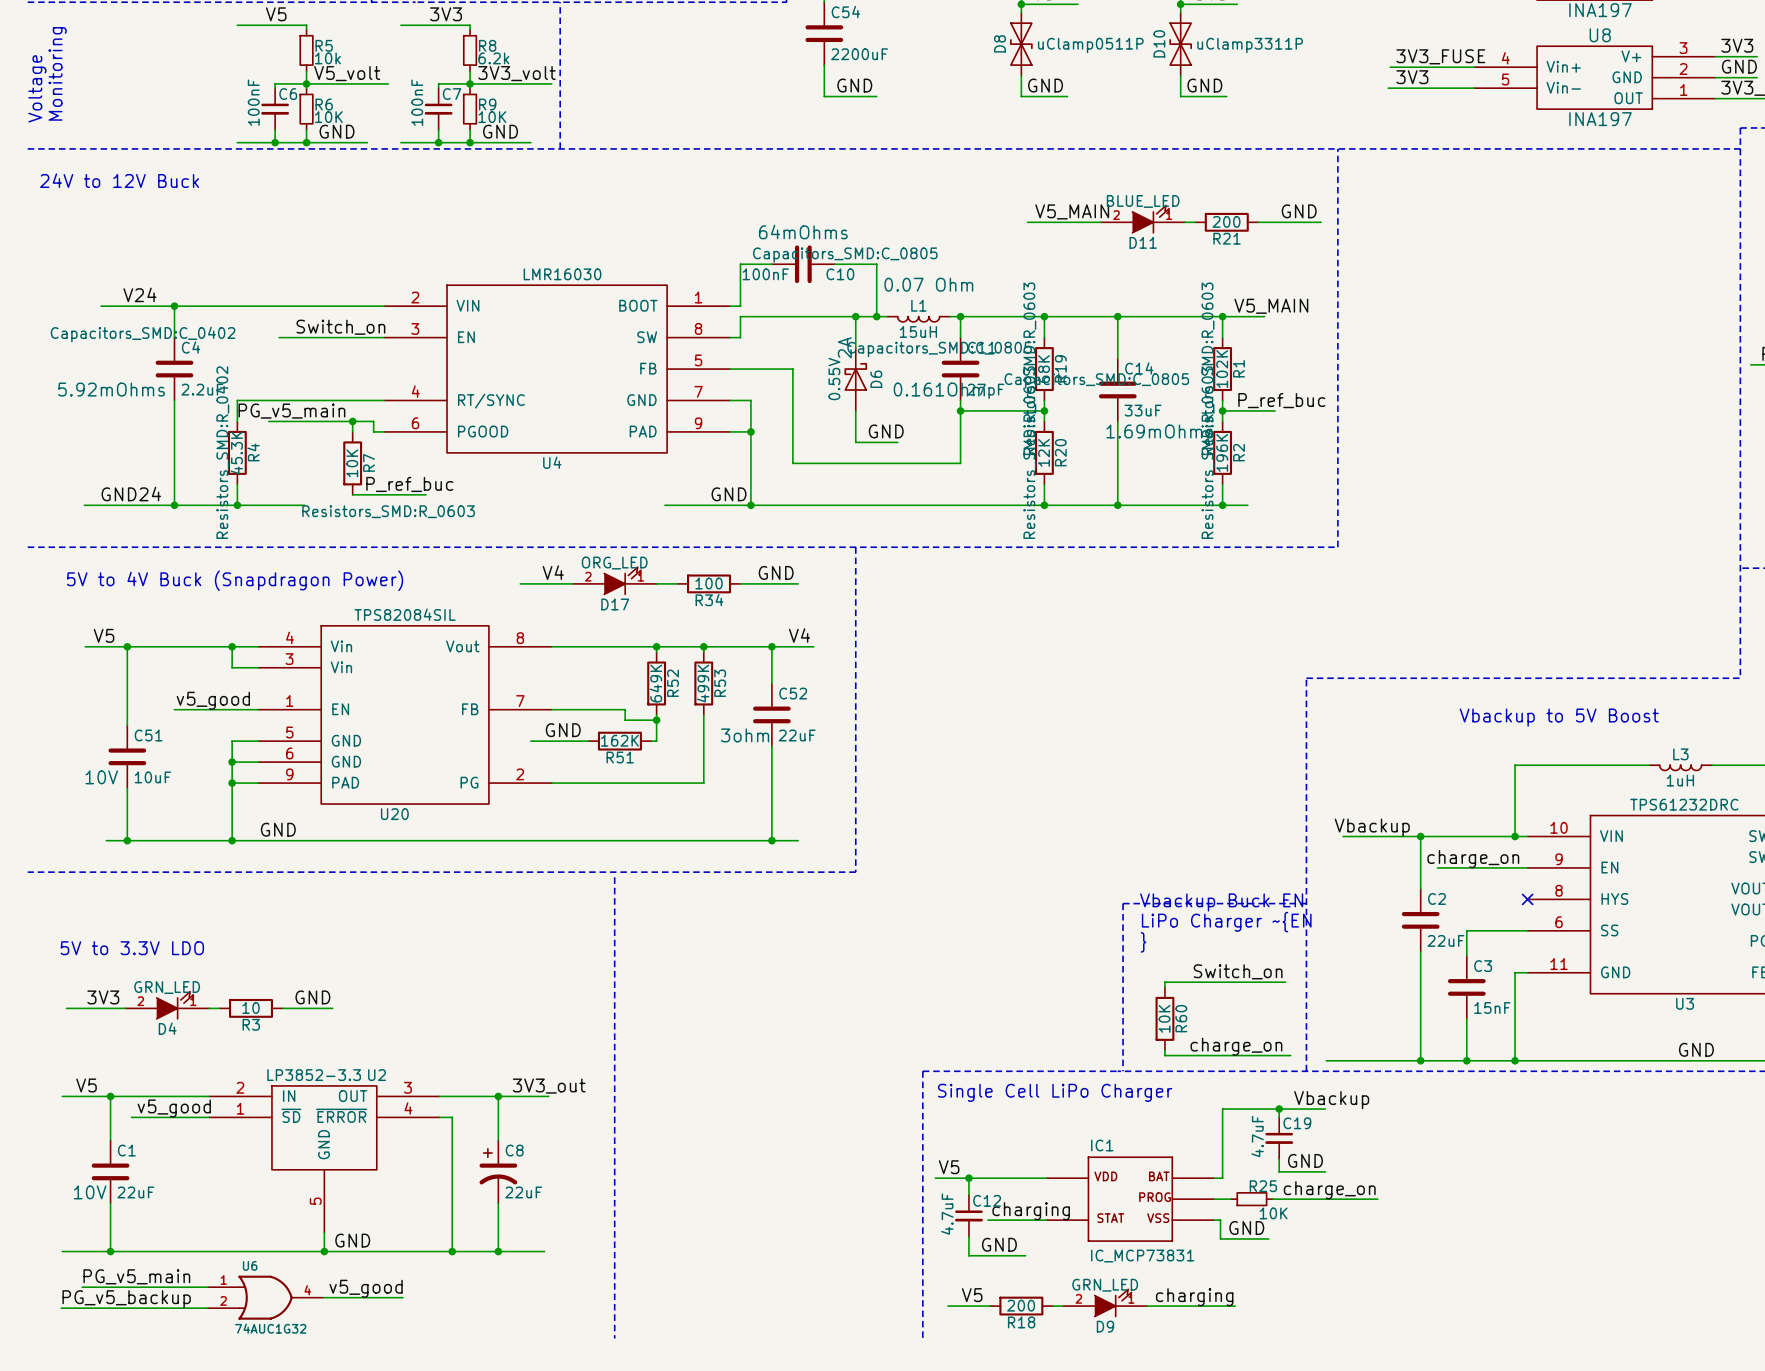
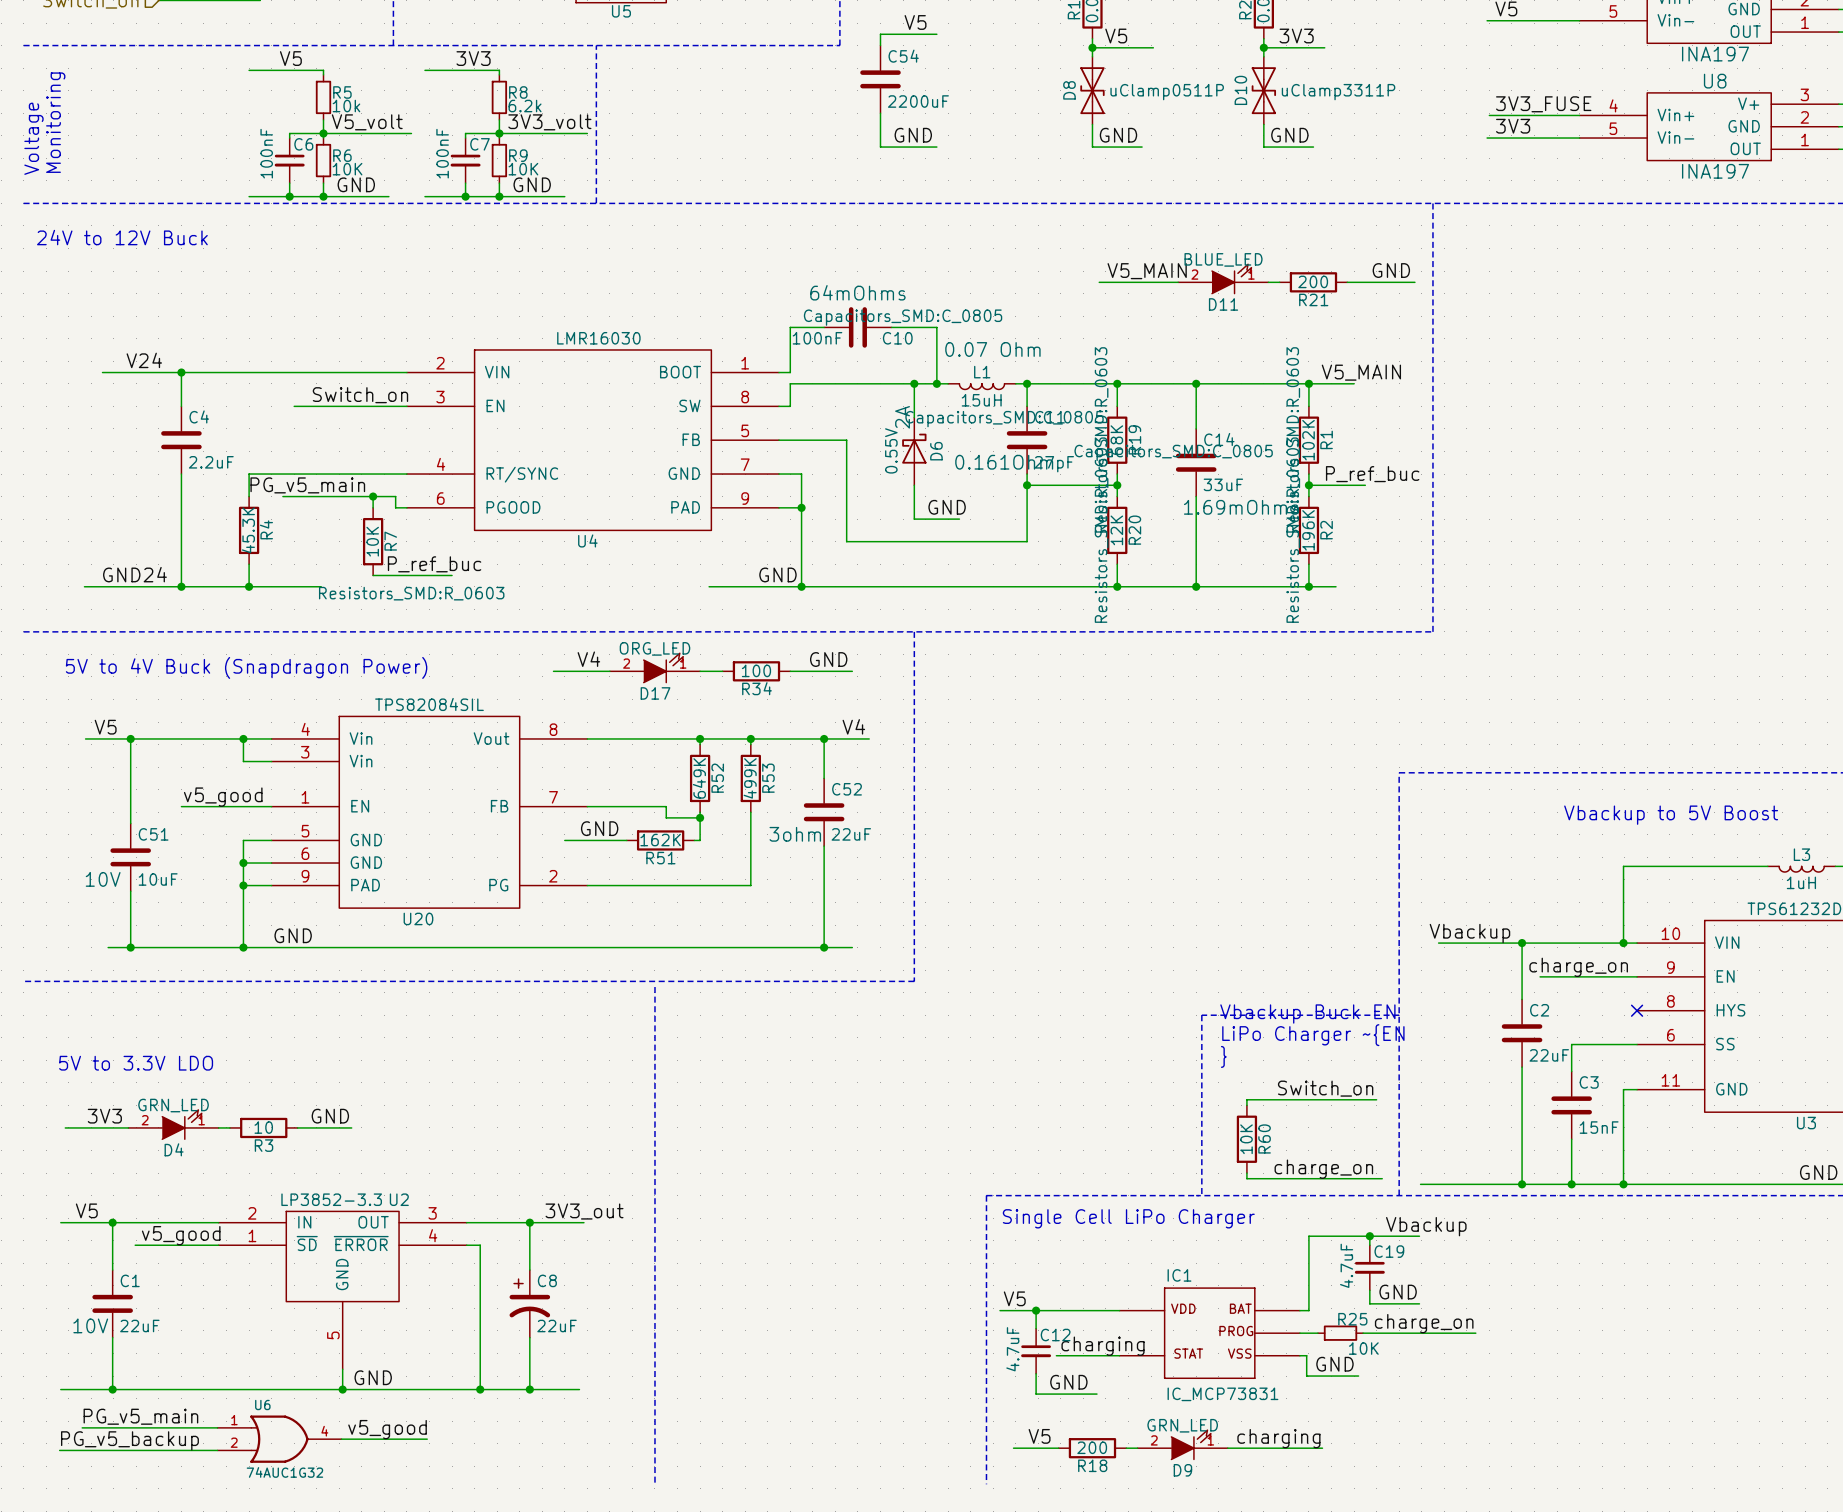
C4 text: Capacitors_SMD:C_0402 (143, 334) -> none
C4 text: 5.92mOhms (111, 389) -> none
R4 text: Resistors_SMD:R_0402 (222, 452) -> none

